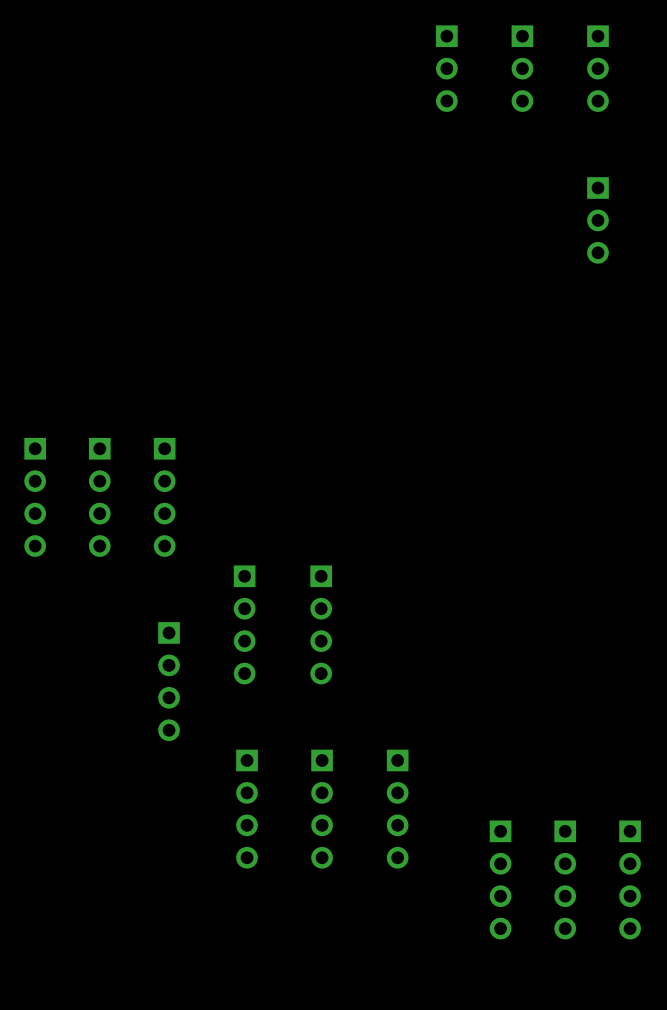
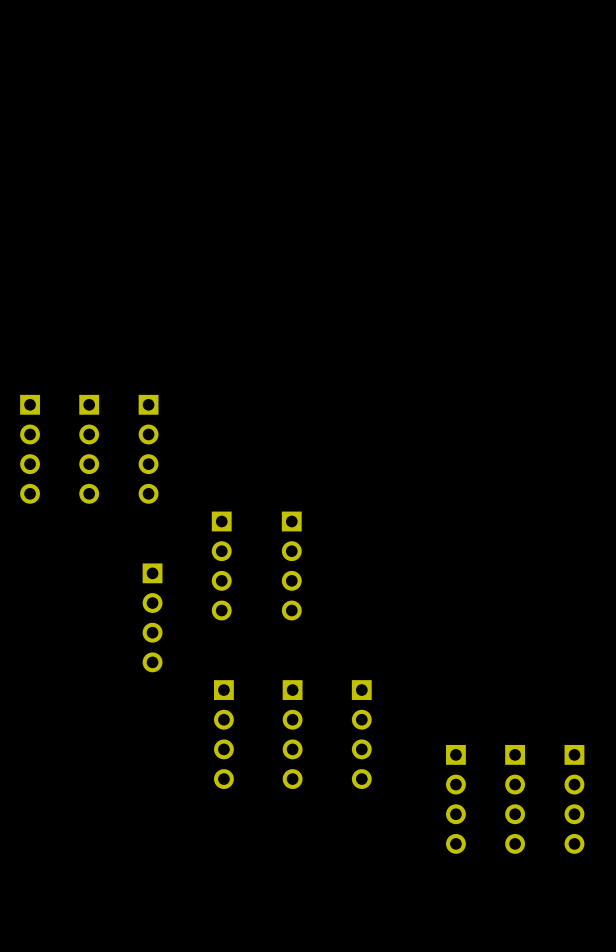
part: (446, 68) -> none
part: (522, 68) -> none
part: (598, 68) -> none
part: (598, 220) -> none

